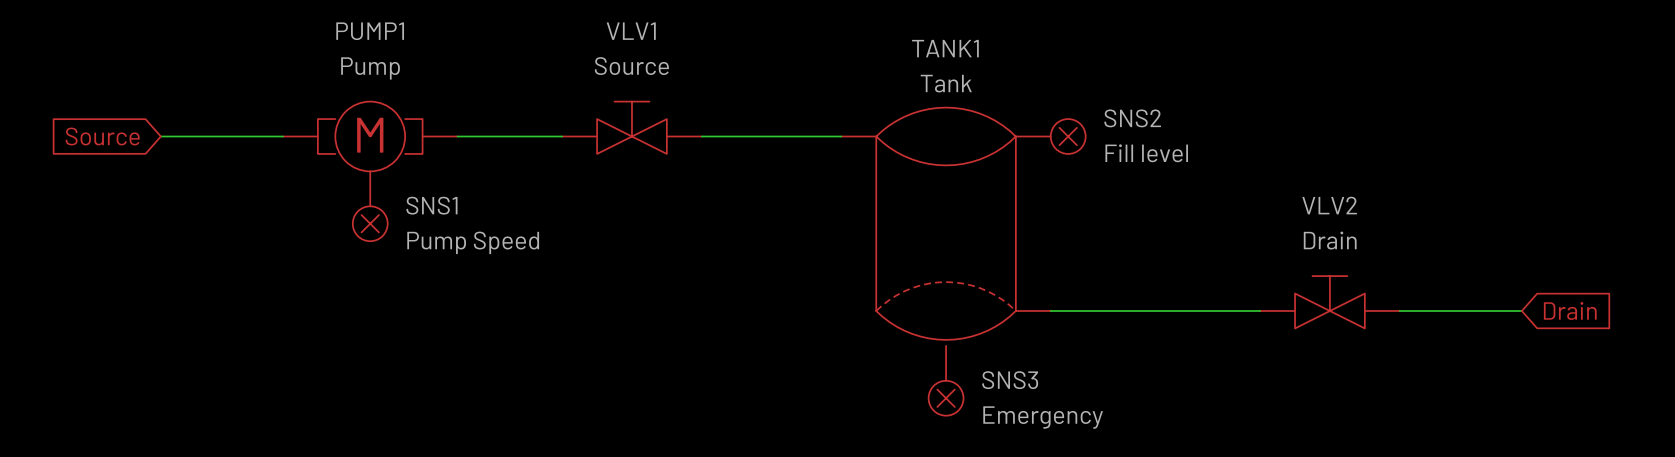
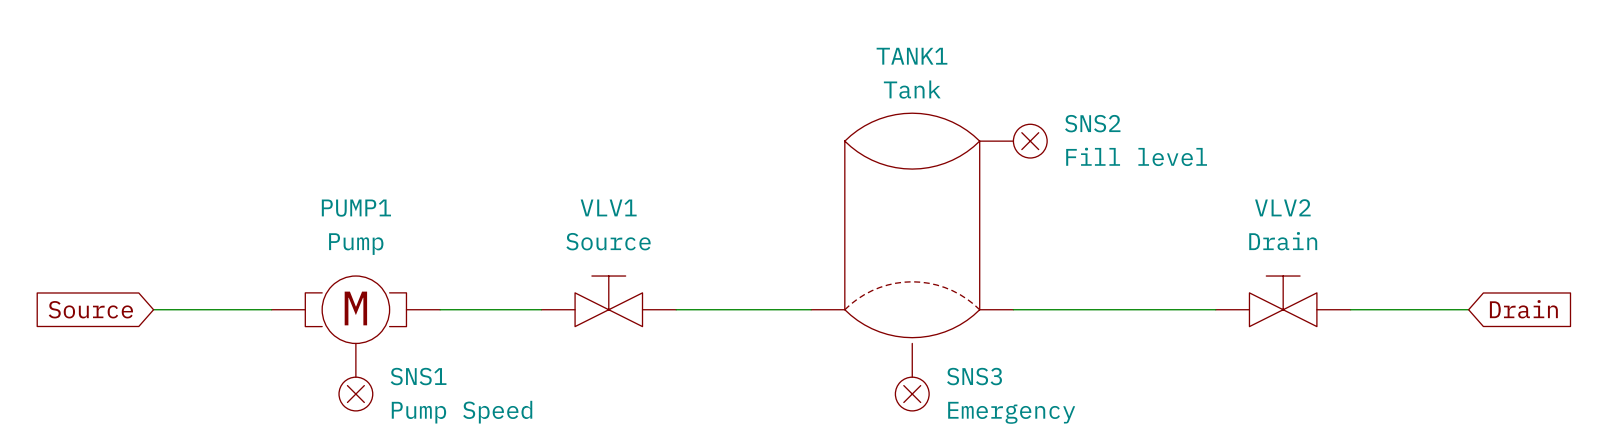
TANK1 symbol: [841, 107, 1051, 340] -> [811, 113, 1014, 338]
VLV1 position: (631, 127) -> (608, 301)
global label position: Source (102, 136) -> Source (90, 309)
wire: (160, 136) (282, 136) -> (153, 309) (271, 309)
PUMP1 position: (370, 136) -> (355, 309)
wire: (457, 136) (562, 136) -> (440, 309) (541, 309)
wire: (701, 136) (841, 136) -> (676, 309) (811, 309)
SNS1 position: (370, 206) -> (355, 377)

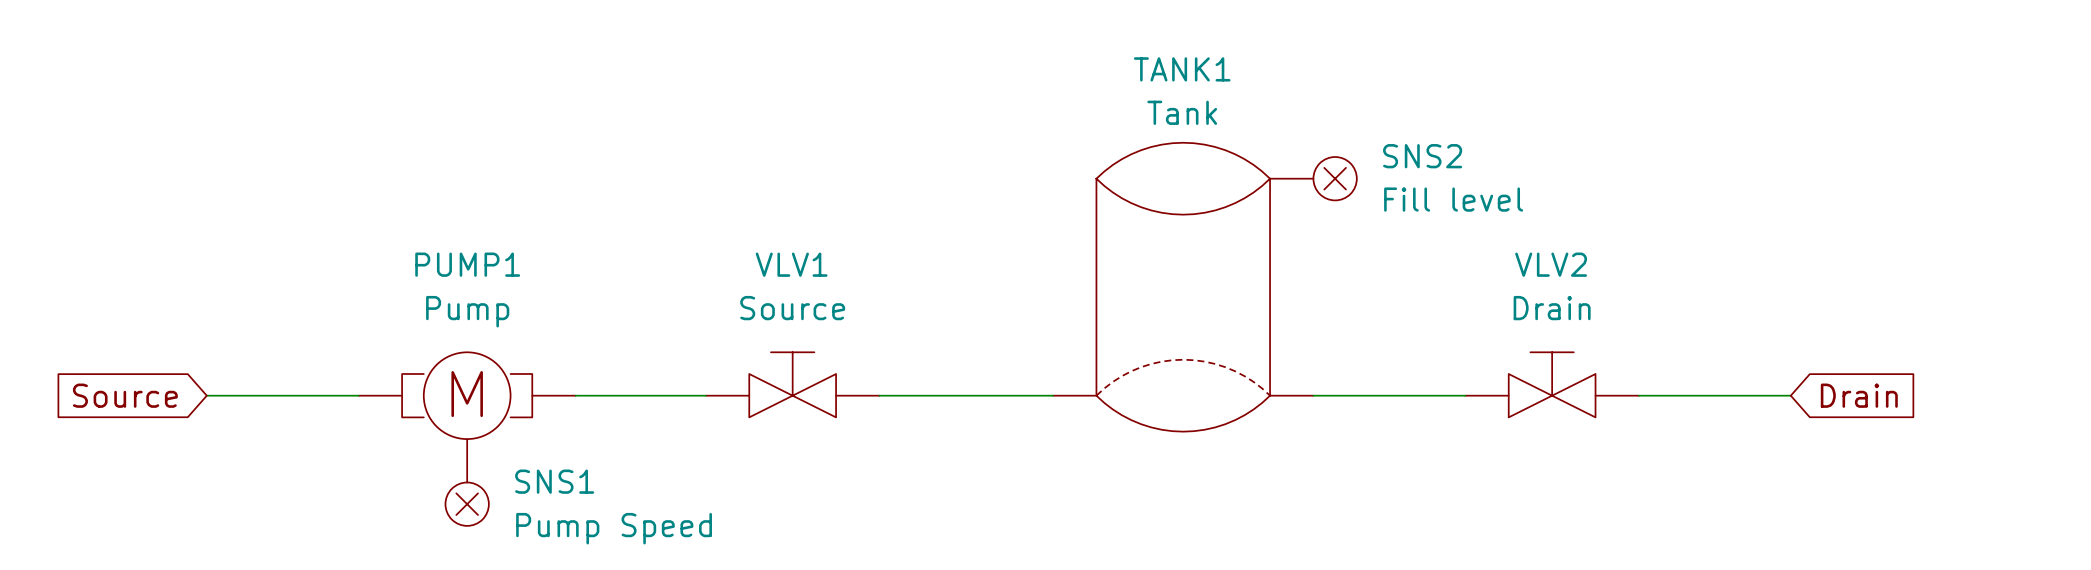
VLV2 position: (1283, 301) -> (1552, 384)
wire: (1131, 309) (1215, 309) -> none
wire: (1384, 309) (1468, 309) -> (1638, 395) (1747, 395)
global label position: Drain (1523, 309) -> Drain (1859, 395)
SNS3: Emergency (912, 377) -> none

